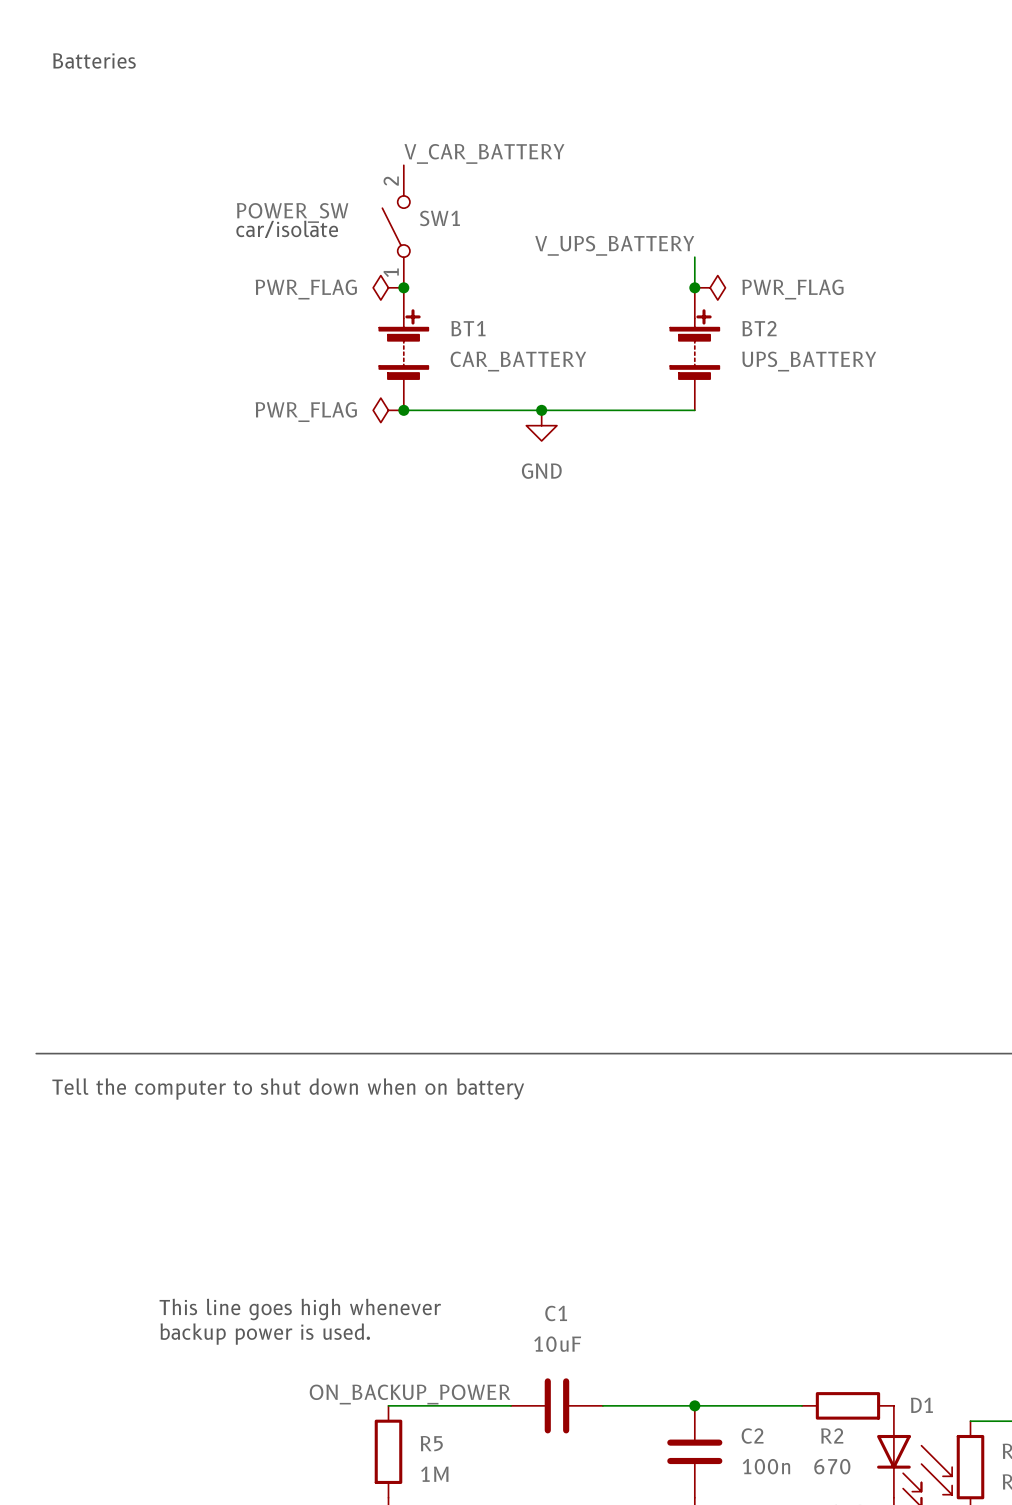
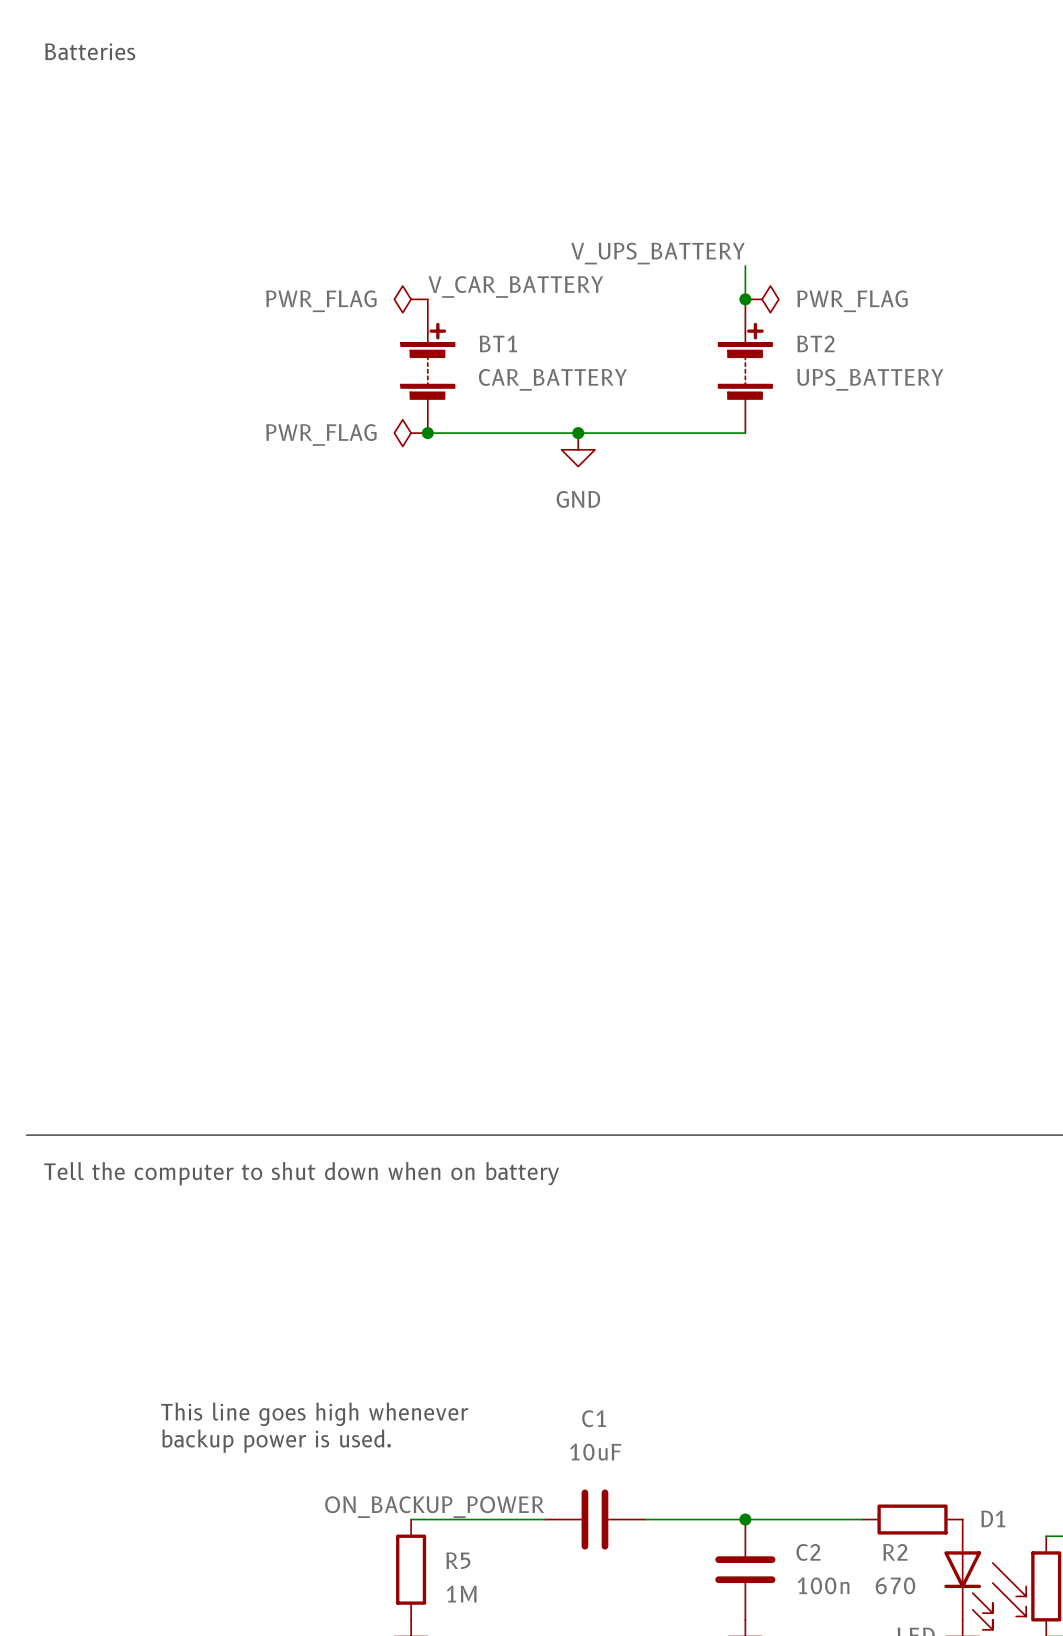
label position: V_CAR_BATTERY (484, 153) -> V_CAR_BATTERY (515, 286)
SW1: POWER_SW (396, 226) -> none
text: car/isolate (287, 229) -> none
junction: (403, 287) -> none

